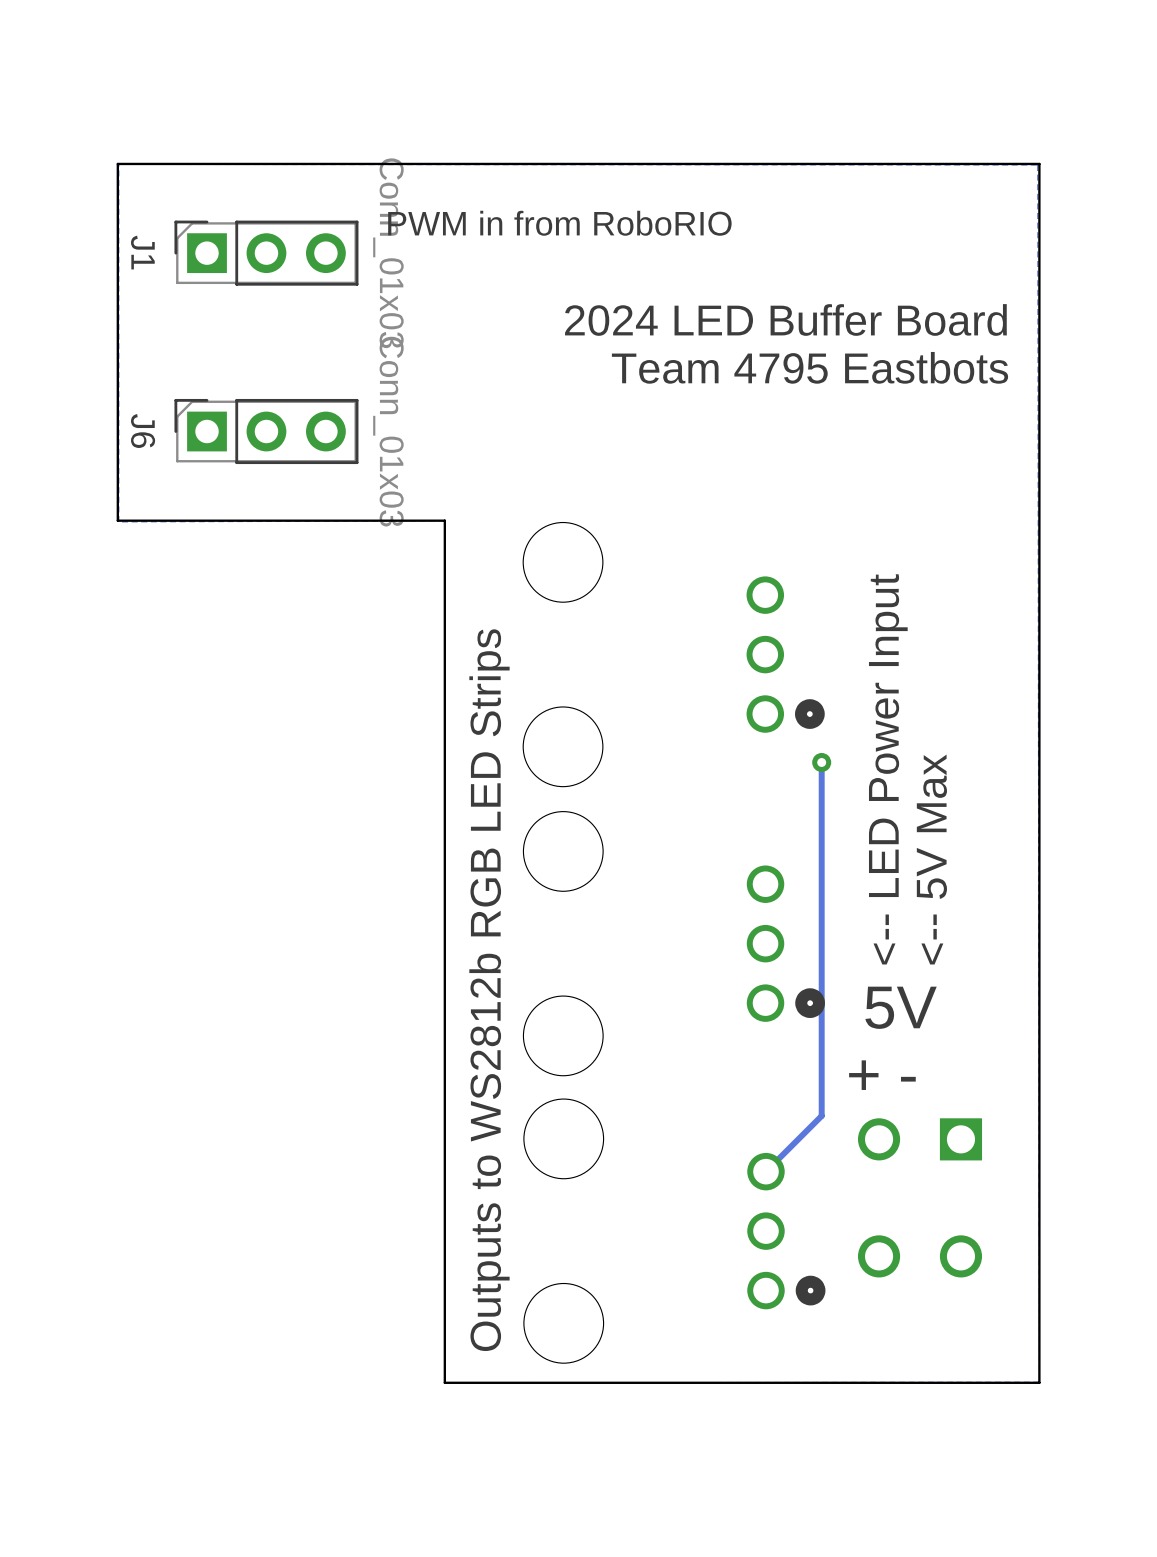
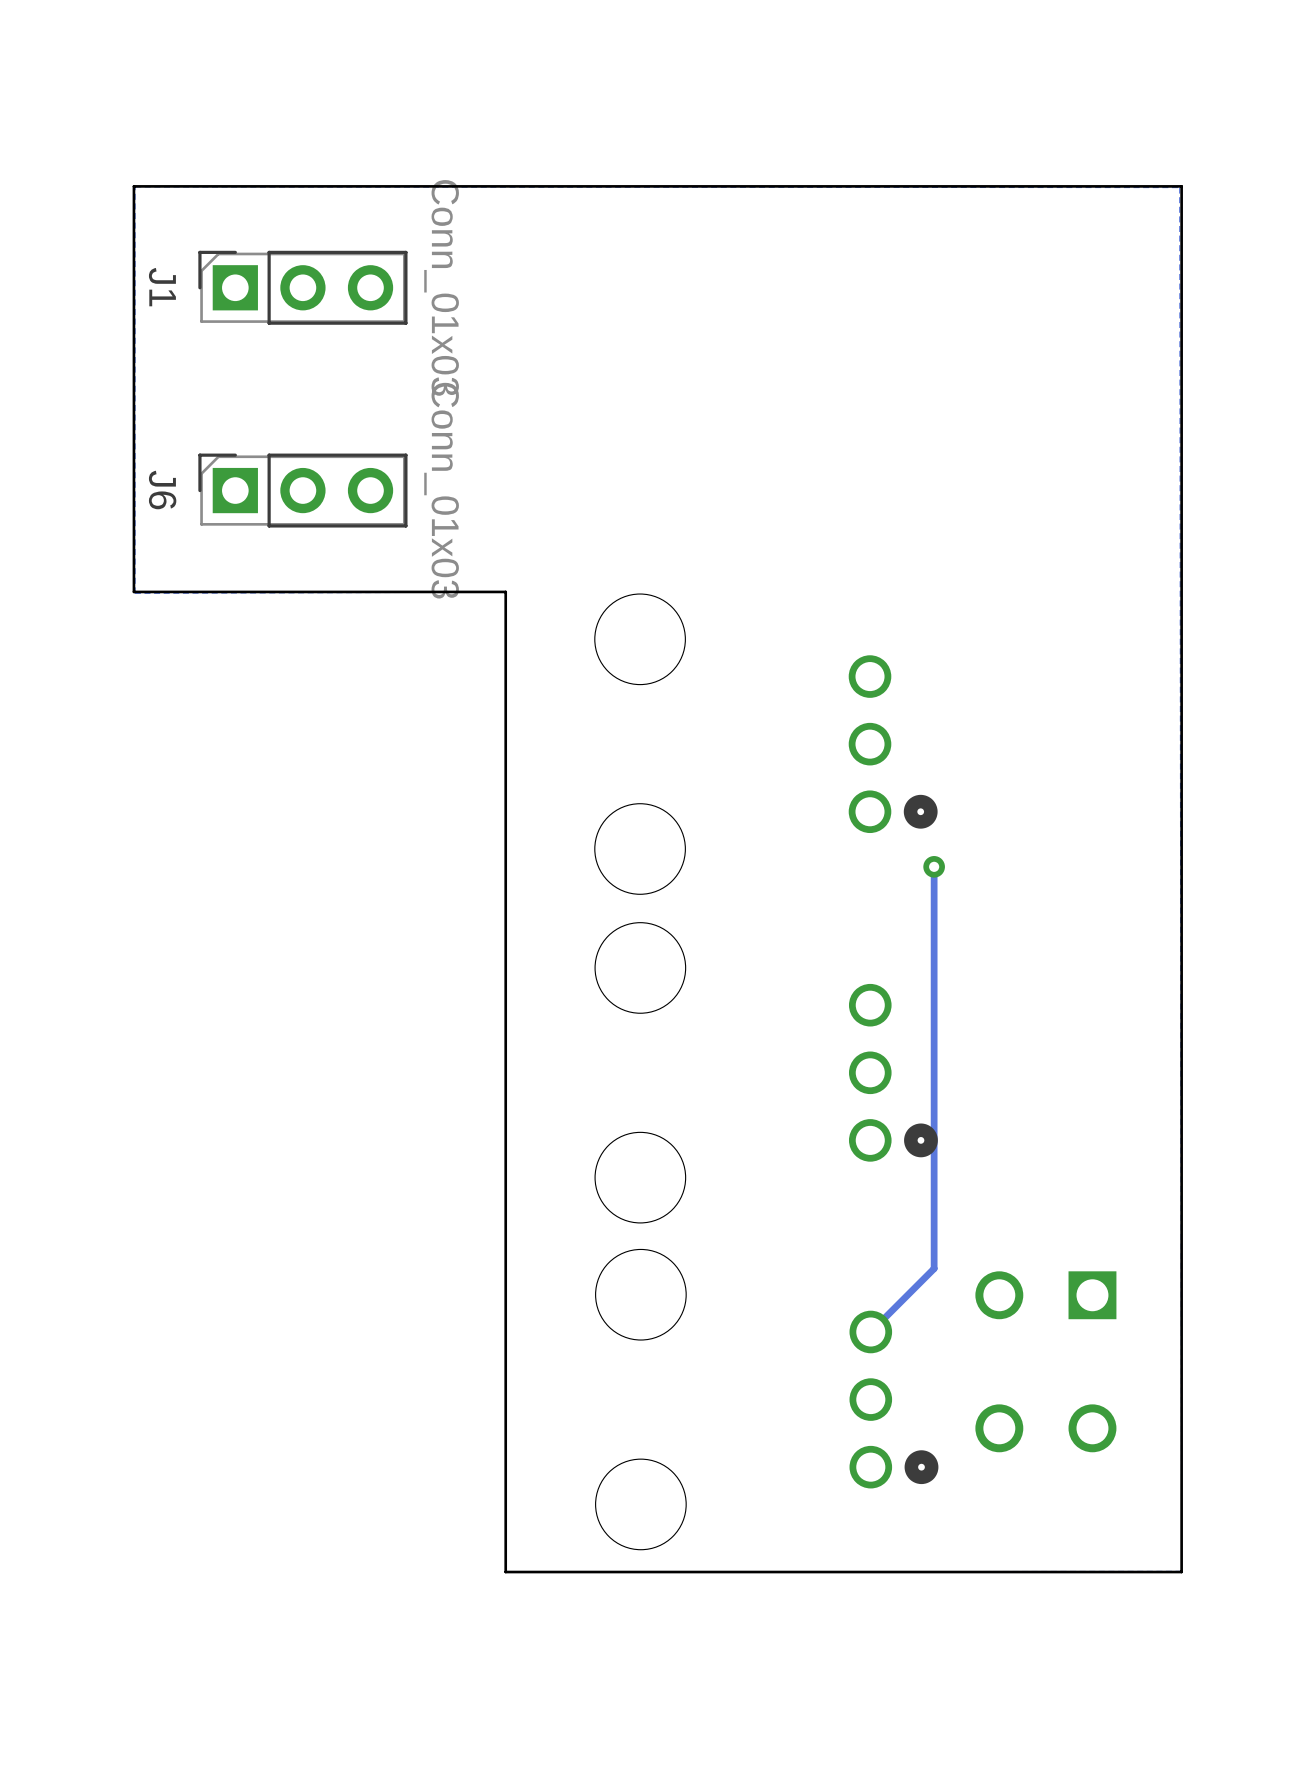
text: PWM in from RoboRIO (559, 223) -> none
text: 2024 LED Buffer Board (785, 319) -> none
text: Team 4795 Eastbots (810, 367) -> none
text: <-- LED Power Input (888, 769) -> none
text: <-- 5V Max (931, 859) -> none
text: Outputs to WS2812b RGB LED Strips (489, 990) -> none
text: 5V (901, 1007) -> none
text: + - (882, 1075) -> none

